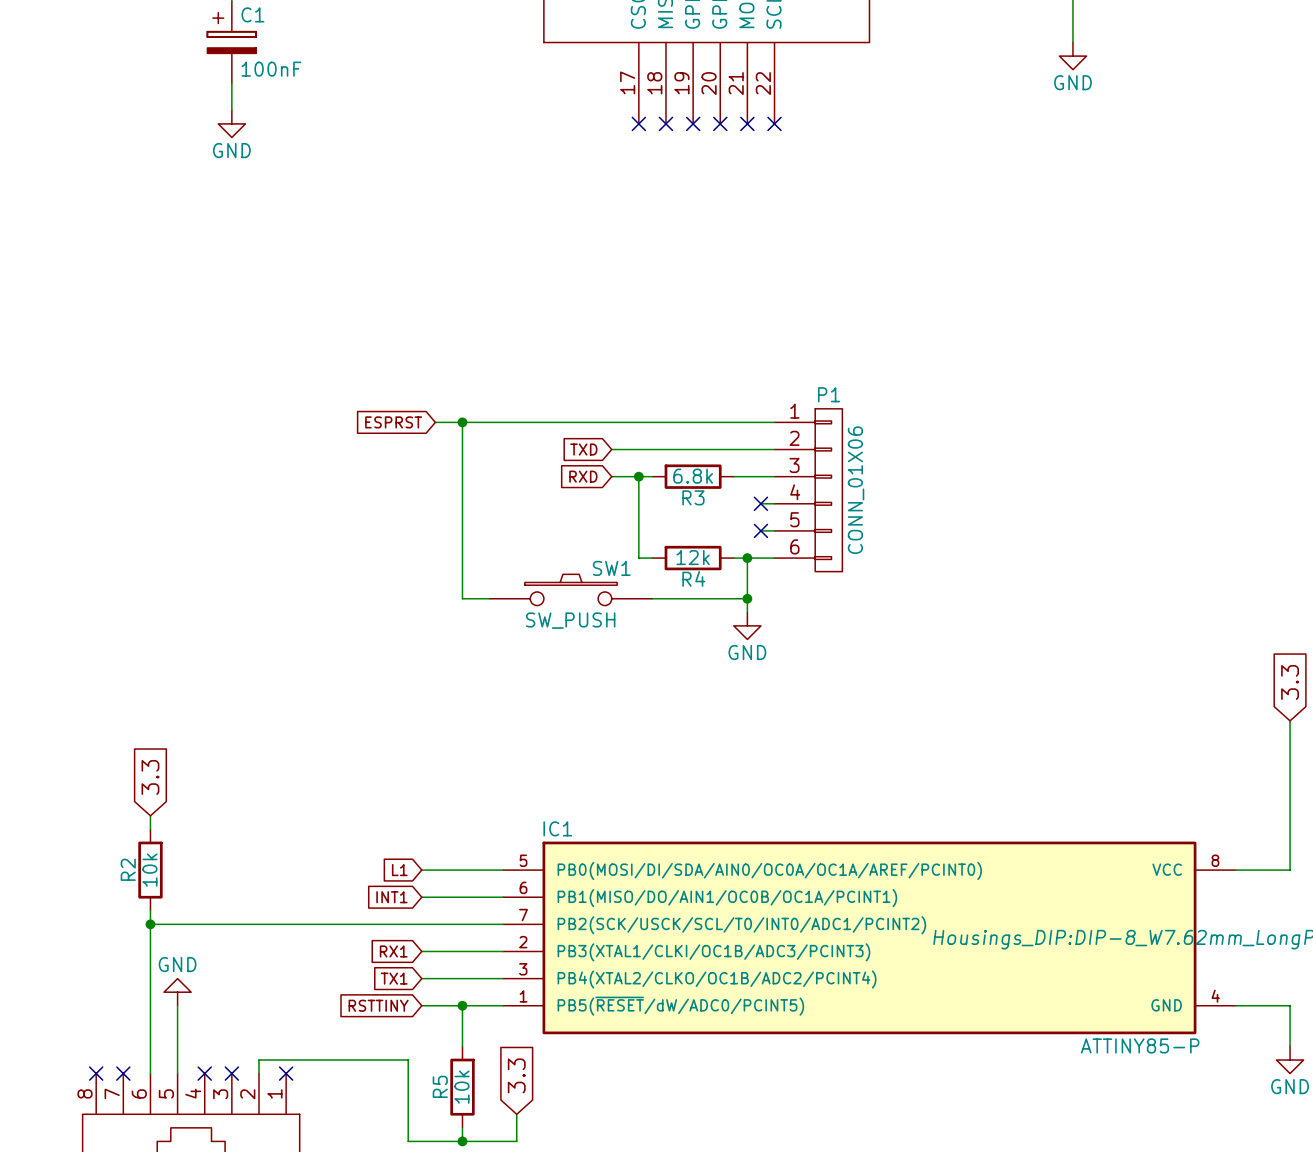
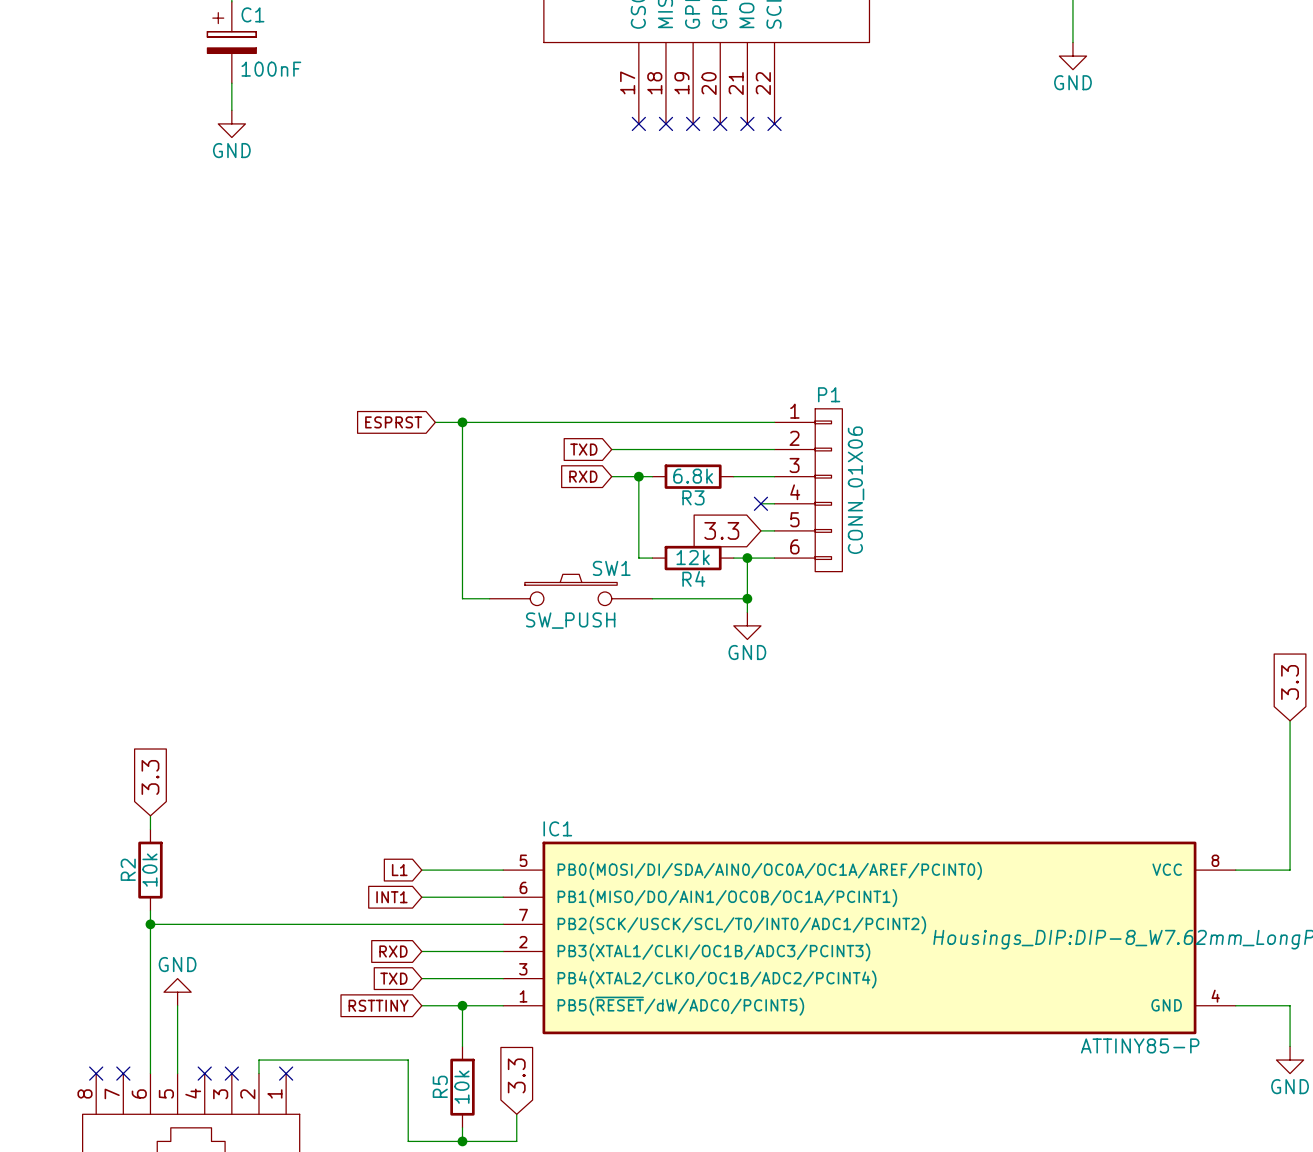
global label: none -> 3.3 (721, 530)
no-connect mark: (760, 530) -> none
global label: RX1 (393, 951) -> RXD (393, 951)
global label: TX1 (394, 978) -> TXD (393, 978)

